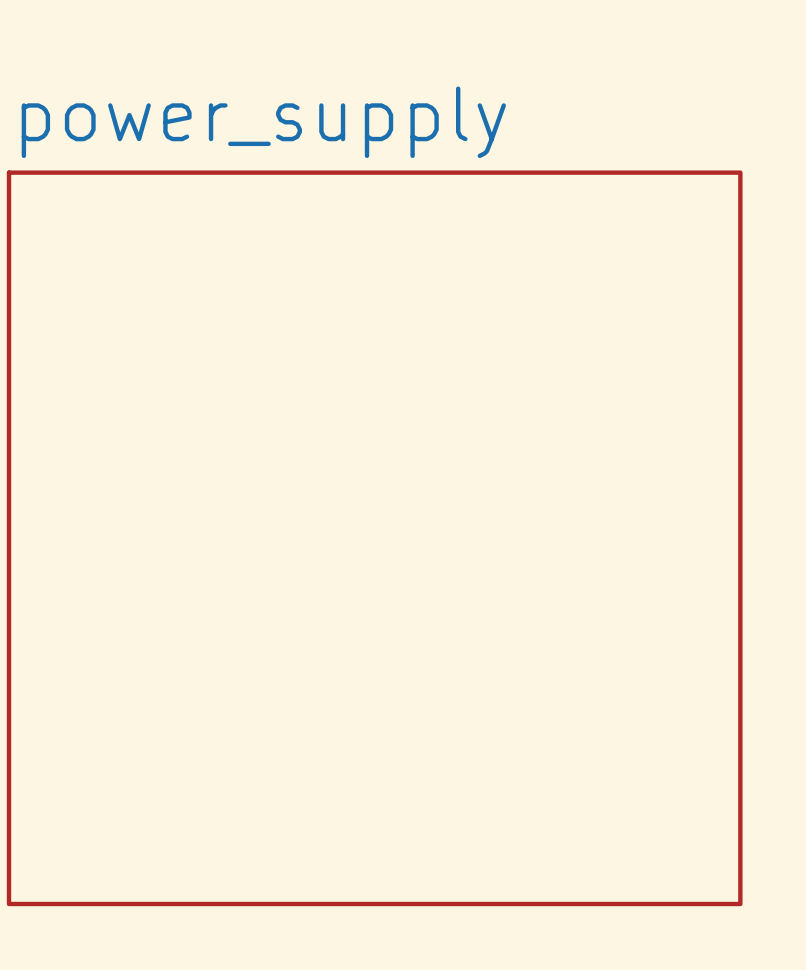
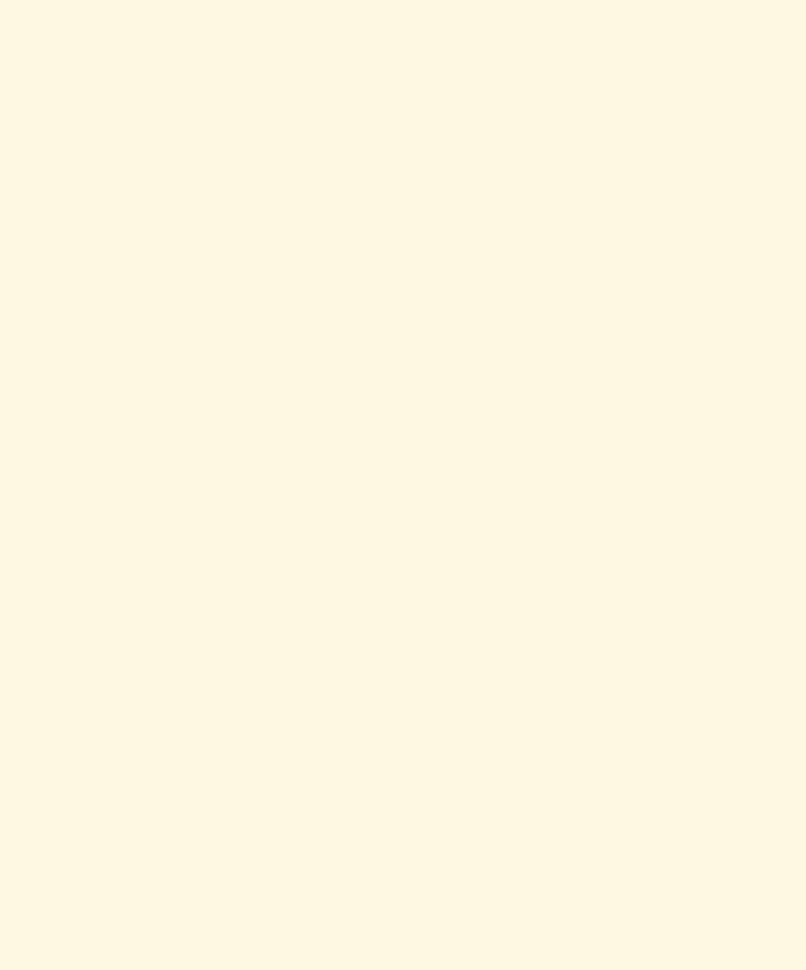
sheet power_supply: (374, 538) -> none

